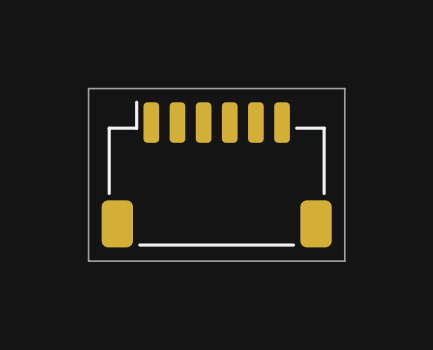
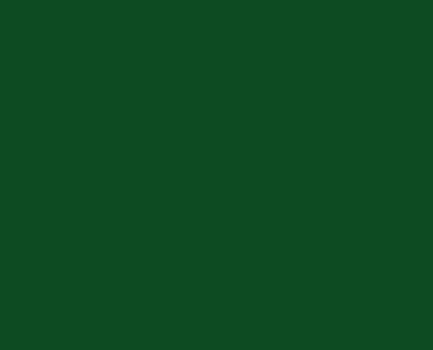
board edge: (344, 88) (88, 88) (88, 261) (344, 261) (344, 88) -> none
part: (216, 174) -> none

